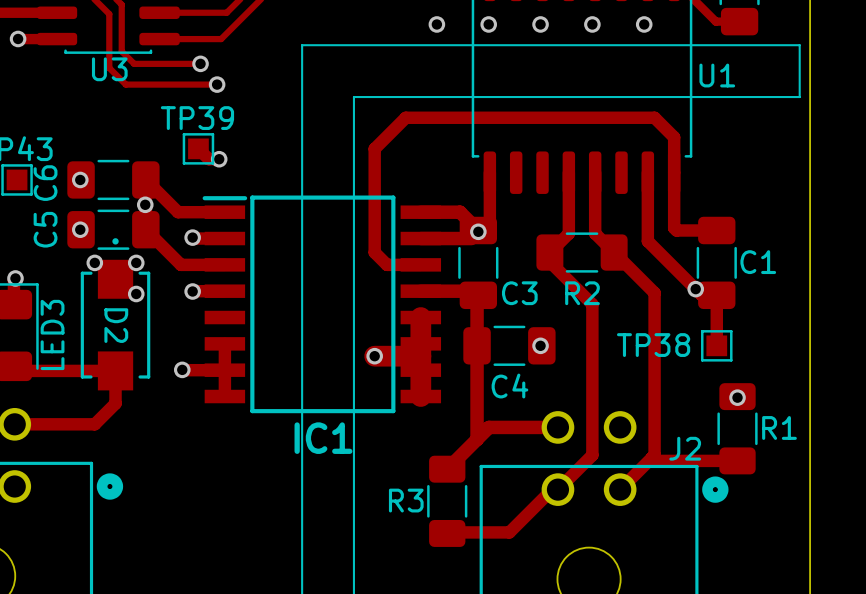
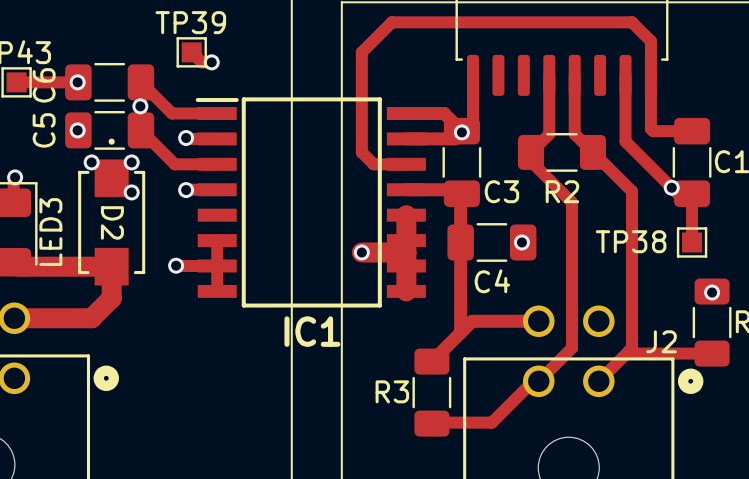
track: none -> (16, 82) (77, 82)
track width: thin (18, 370) (115, 370) (115, 403) (94, 424) (14, 424) -> thick (18, 266) (111, 266) (111, 298) (91, 318) (14, 318)

